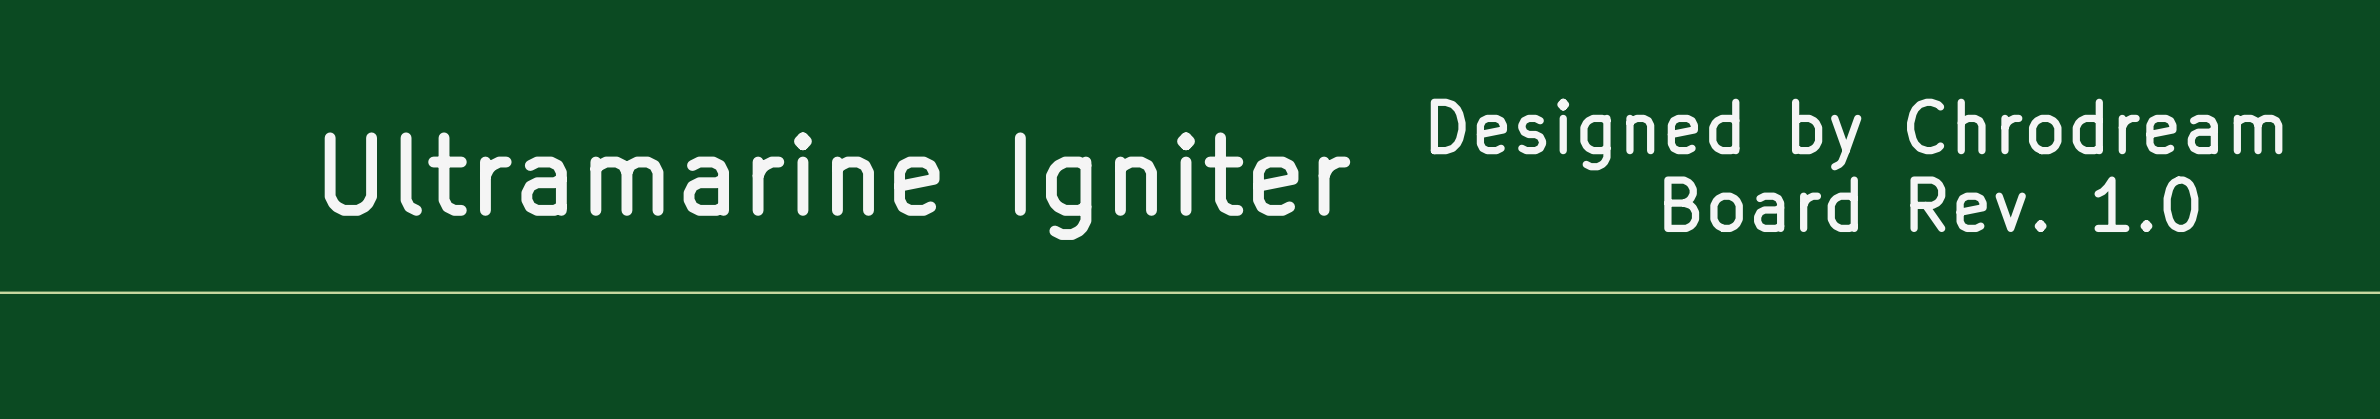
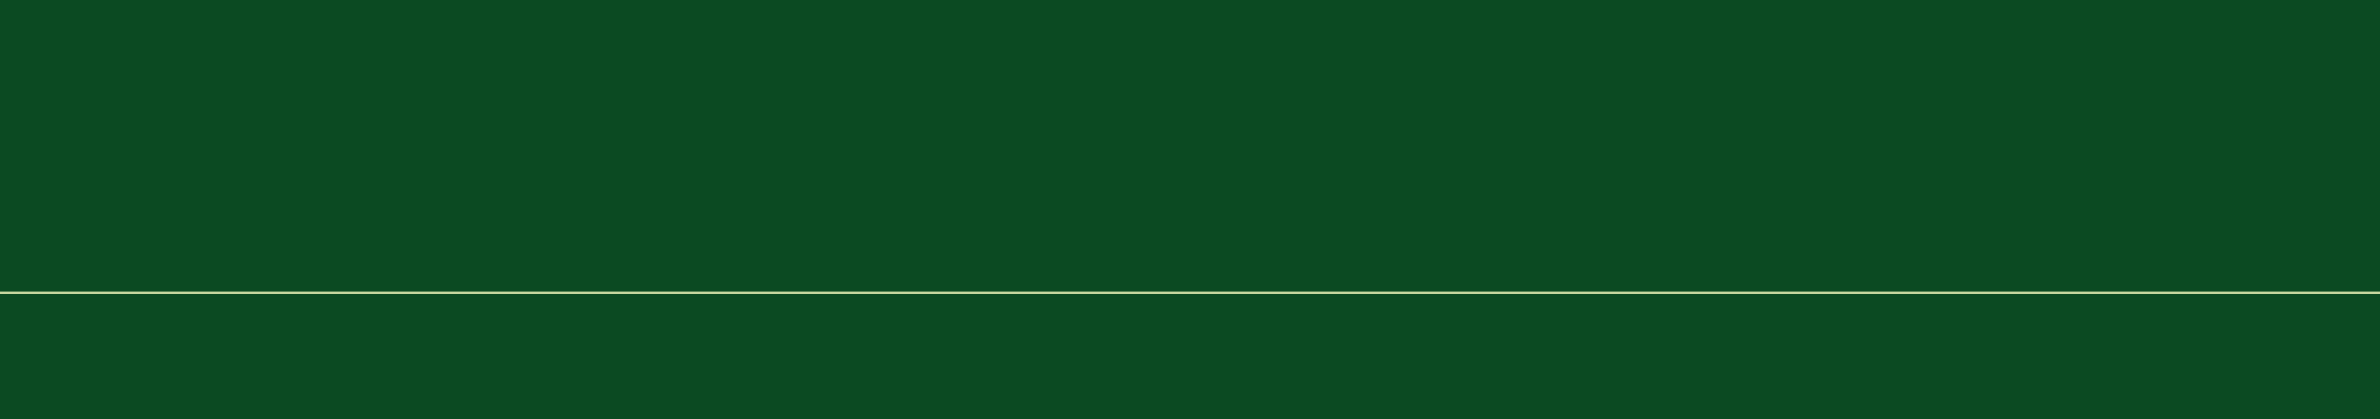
text: Designed by Chrodream (1856, 134) -> none
text: Ultramarine Igniter (837, 186) -> none
text: Board Rev. 1.0 (1931, 204) -> none

